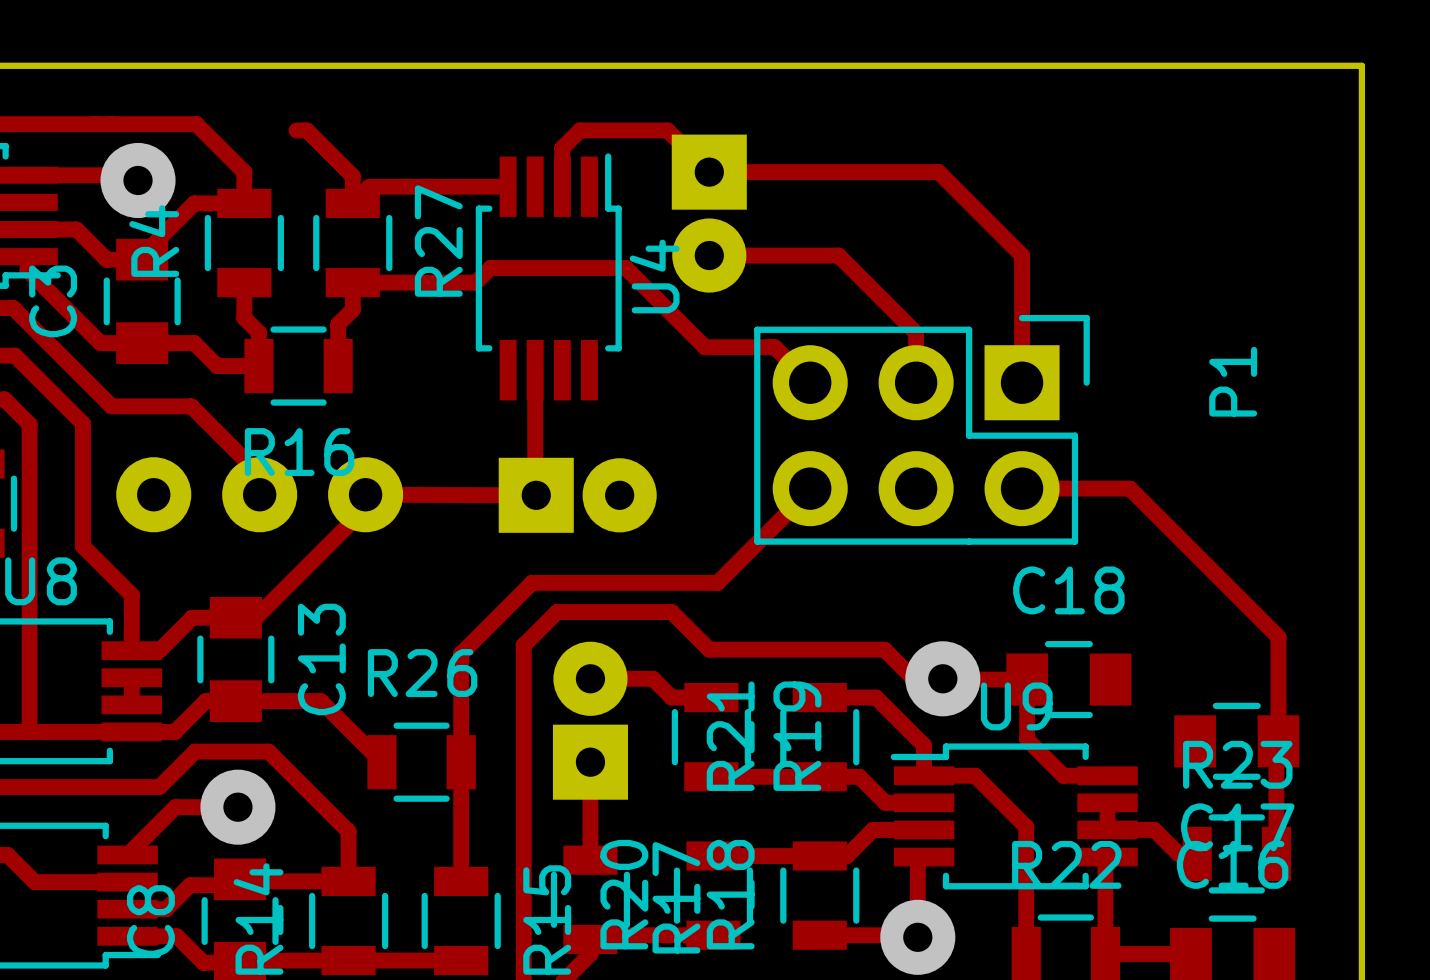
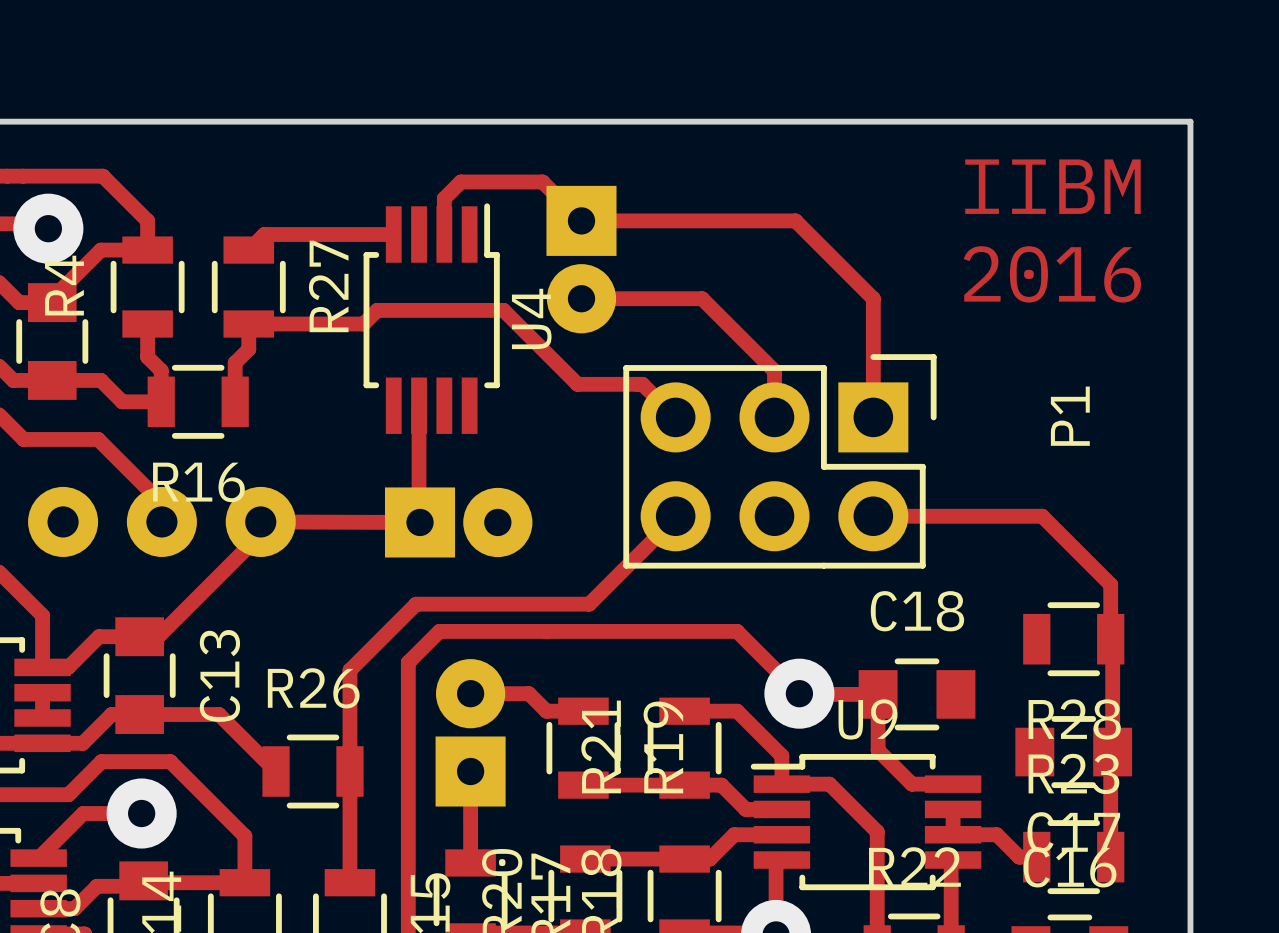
track: (296, 130) (306, 130) (352, 176) (352, 203) -> none
text: none -> IIBM (1052, 186)
text: none -> 2016 (1052, 274)
track: (1130, 488) (1278, 637) -> (974, 516) (1042, 516) (1110, 584) (1110, 639) (1112, 641) (1112, 654)
track: (671, 612) (709, 649) (884, 649) (913, 678) (942, 678) -> (546, 631) (737, 631) (799, 693)
R28: none -> (1073, 639)

